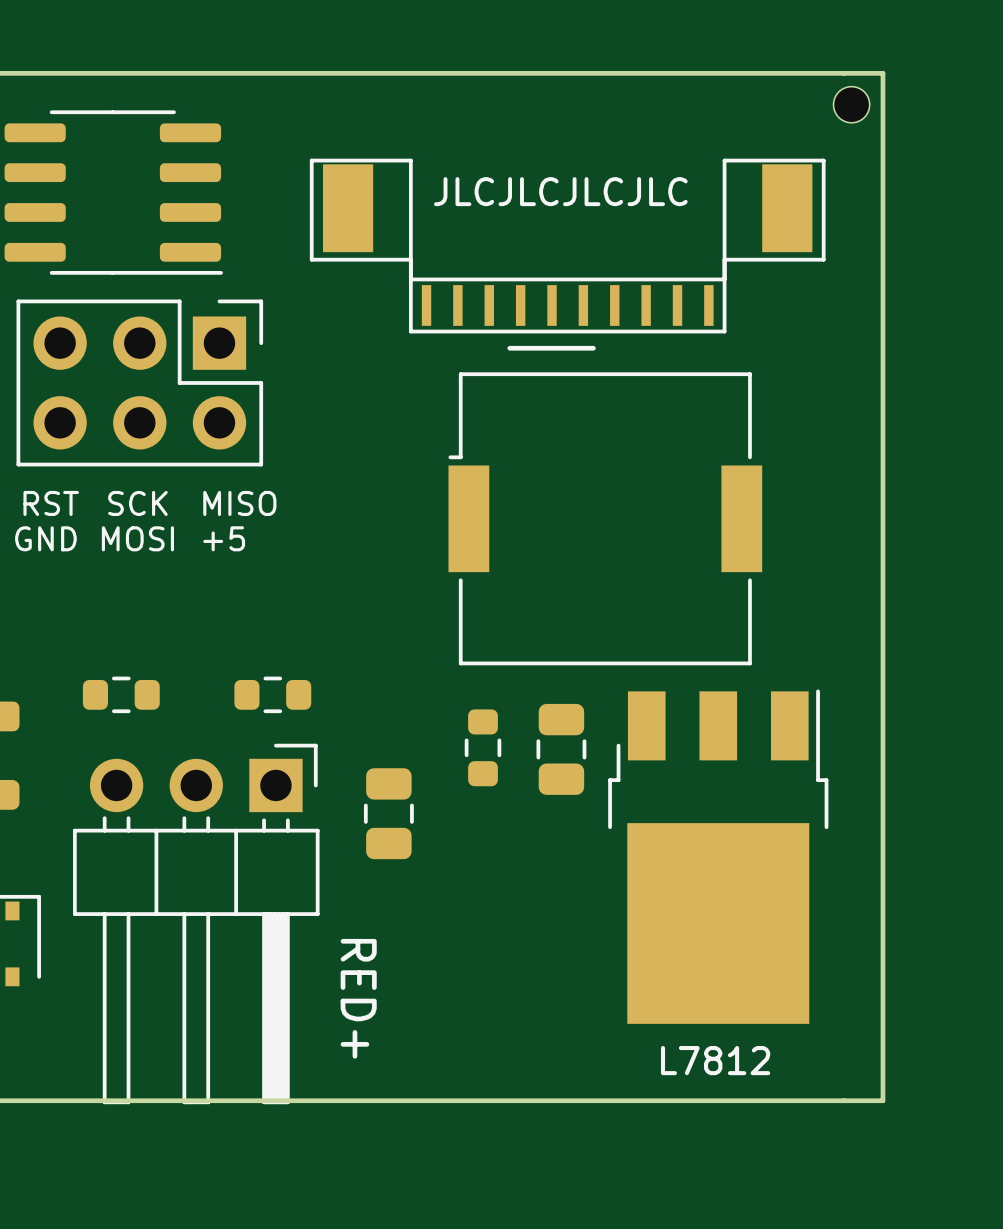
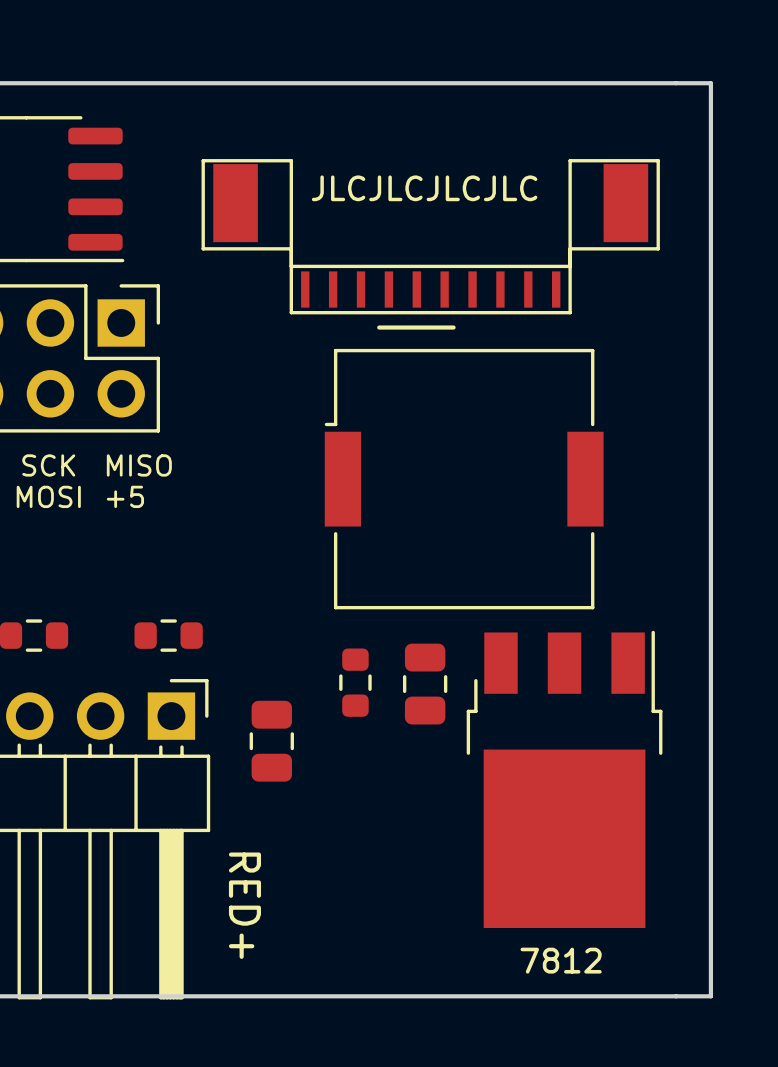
part: (851, 104) -> none
part value: L7812 (715, 1060) -> 7812 (561, 960)

